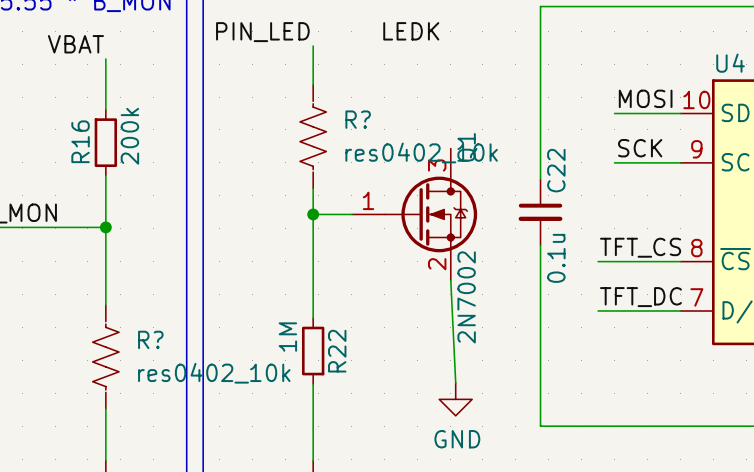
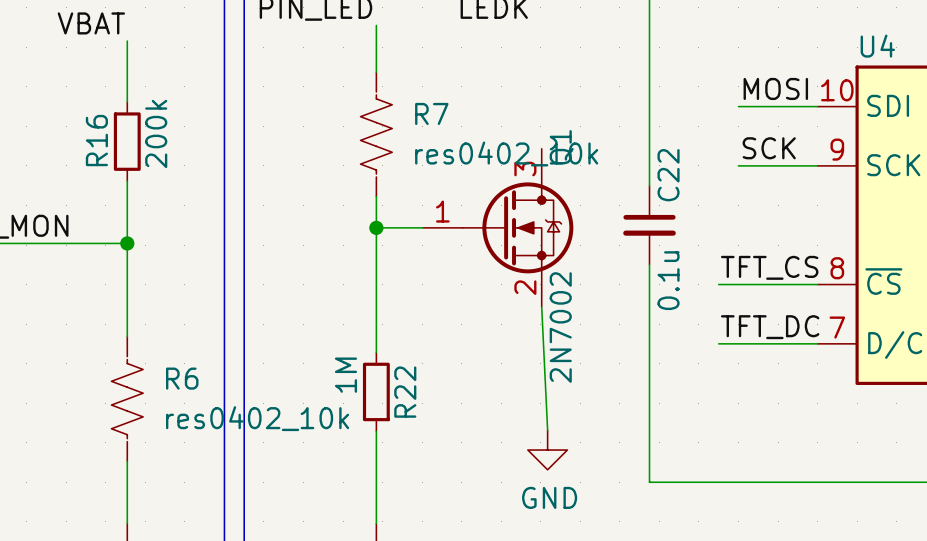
R? name: R? (358, 119) -> R7 (431, 113)
R? name: R? (150, 339) -> R6 (182, 378)

